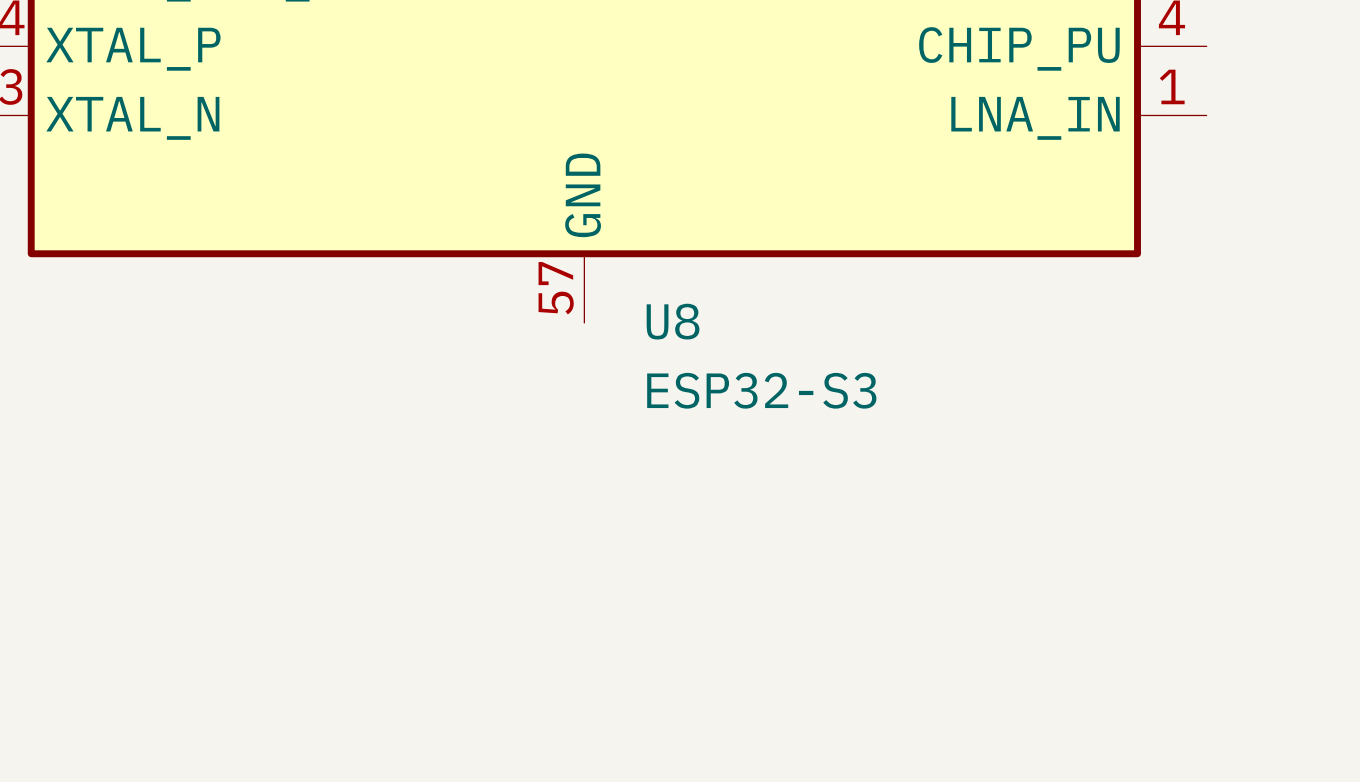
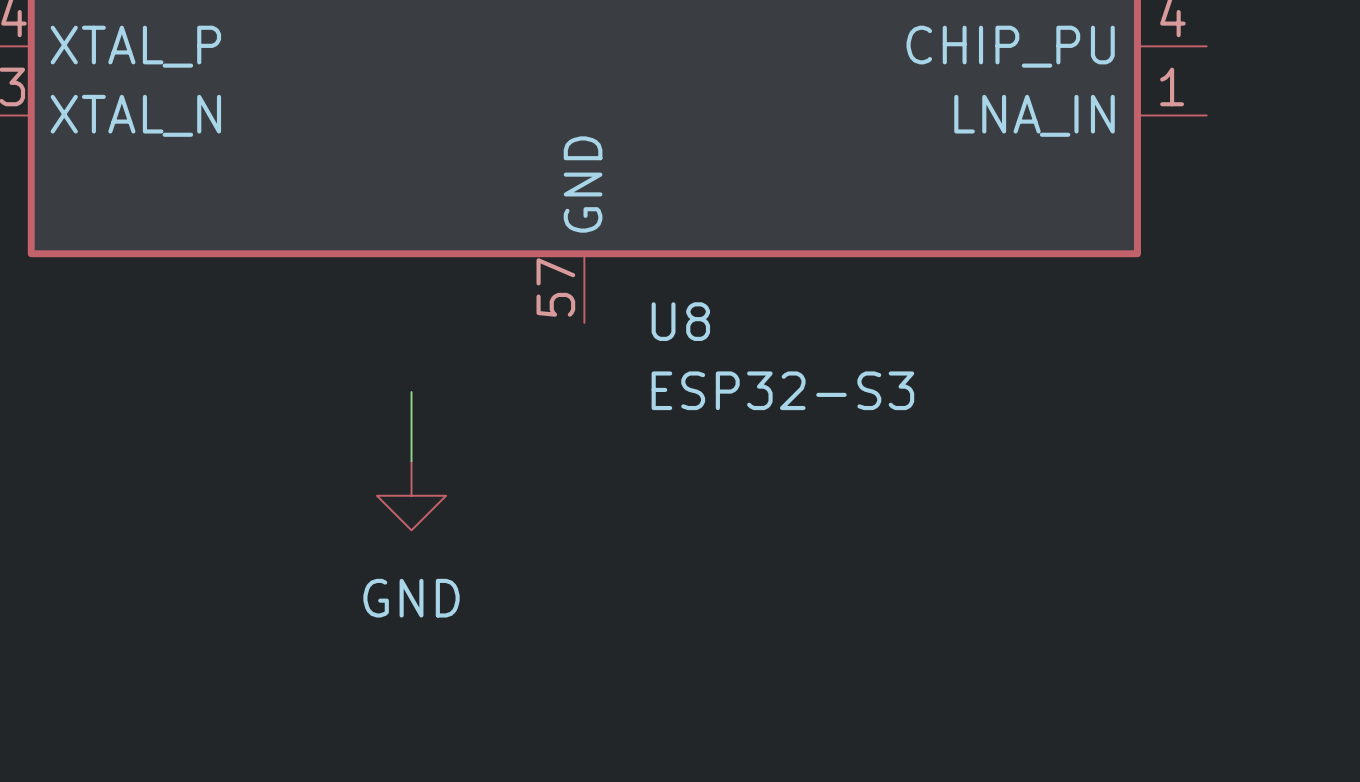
wire: none -> (411, 392) (411, 461)
power symbol: none -> GND (411, 495)

